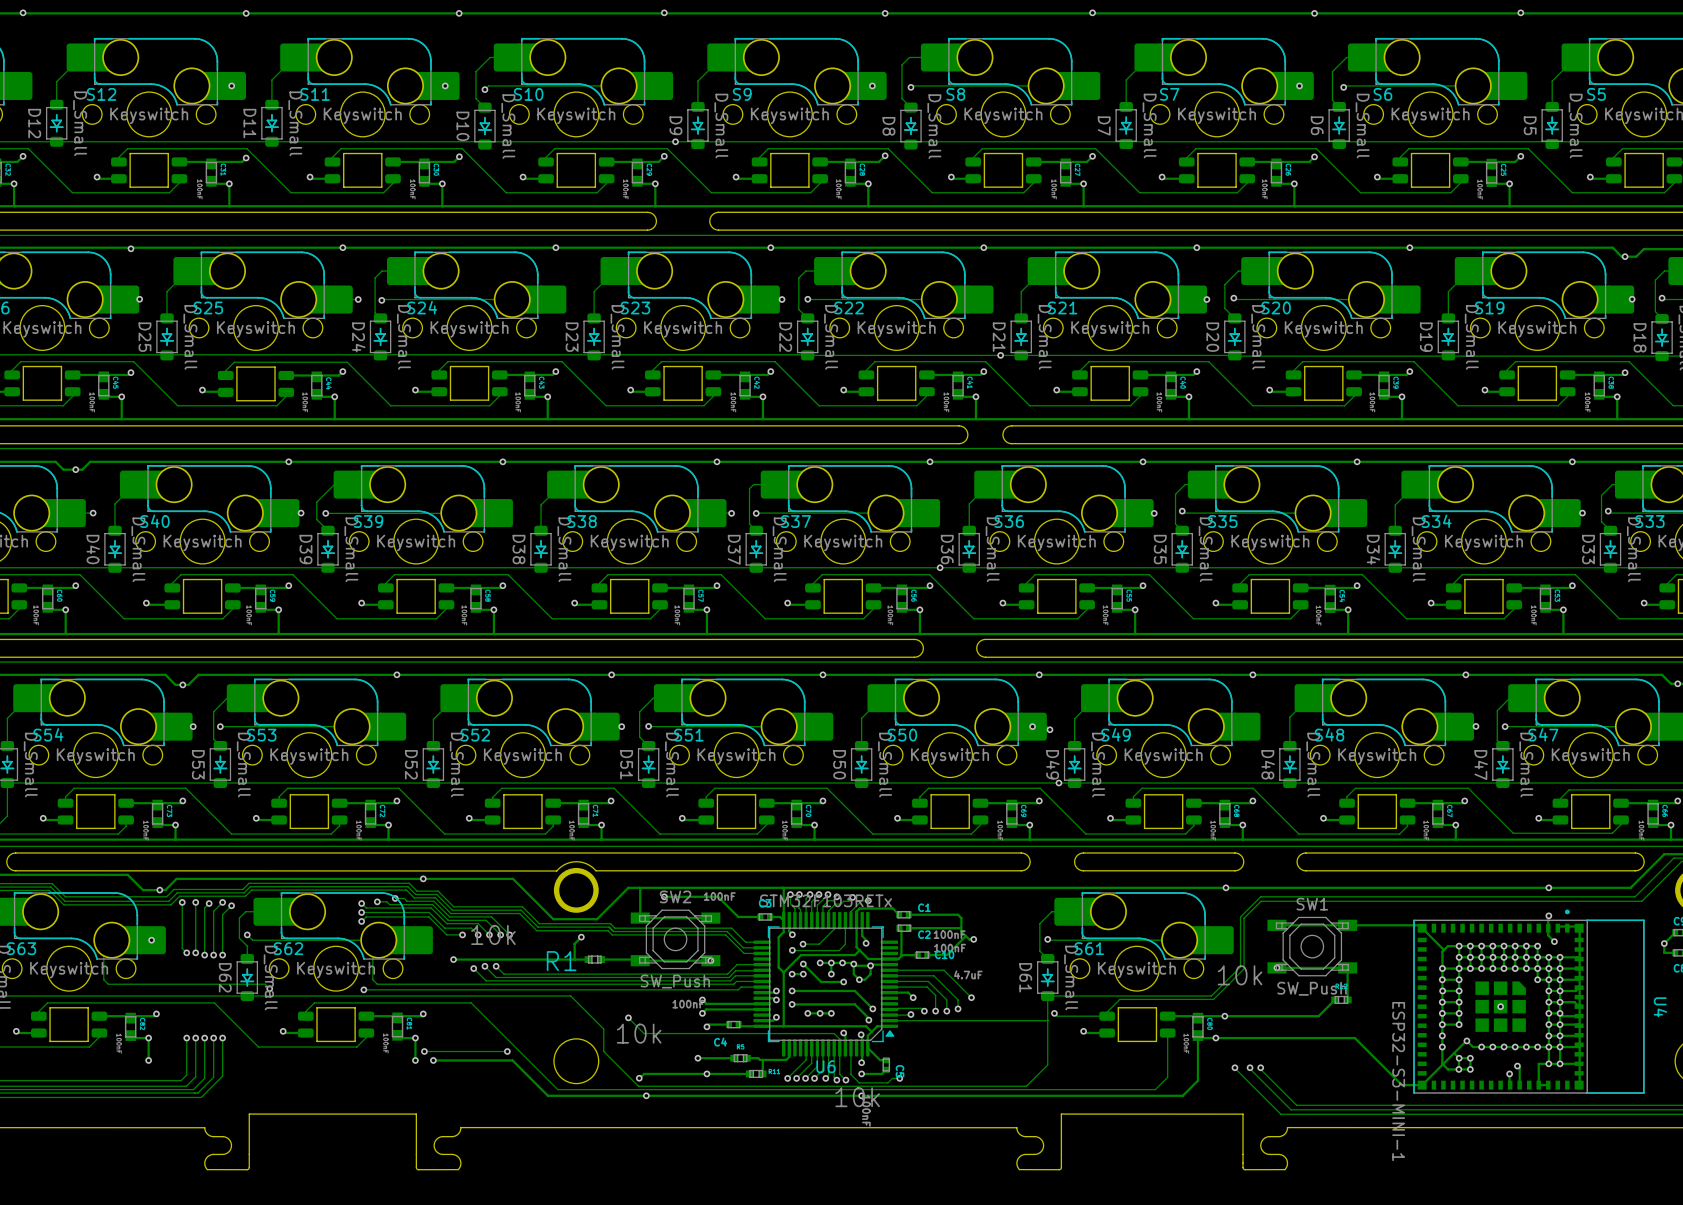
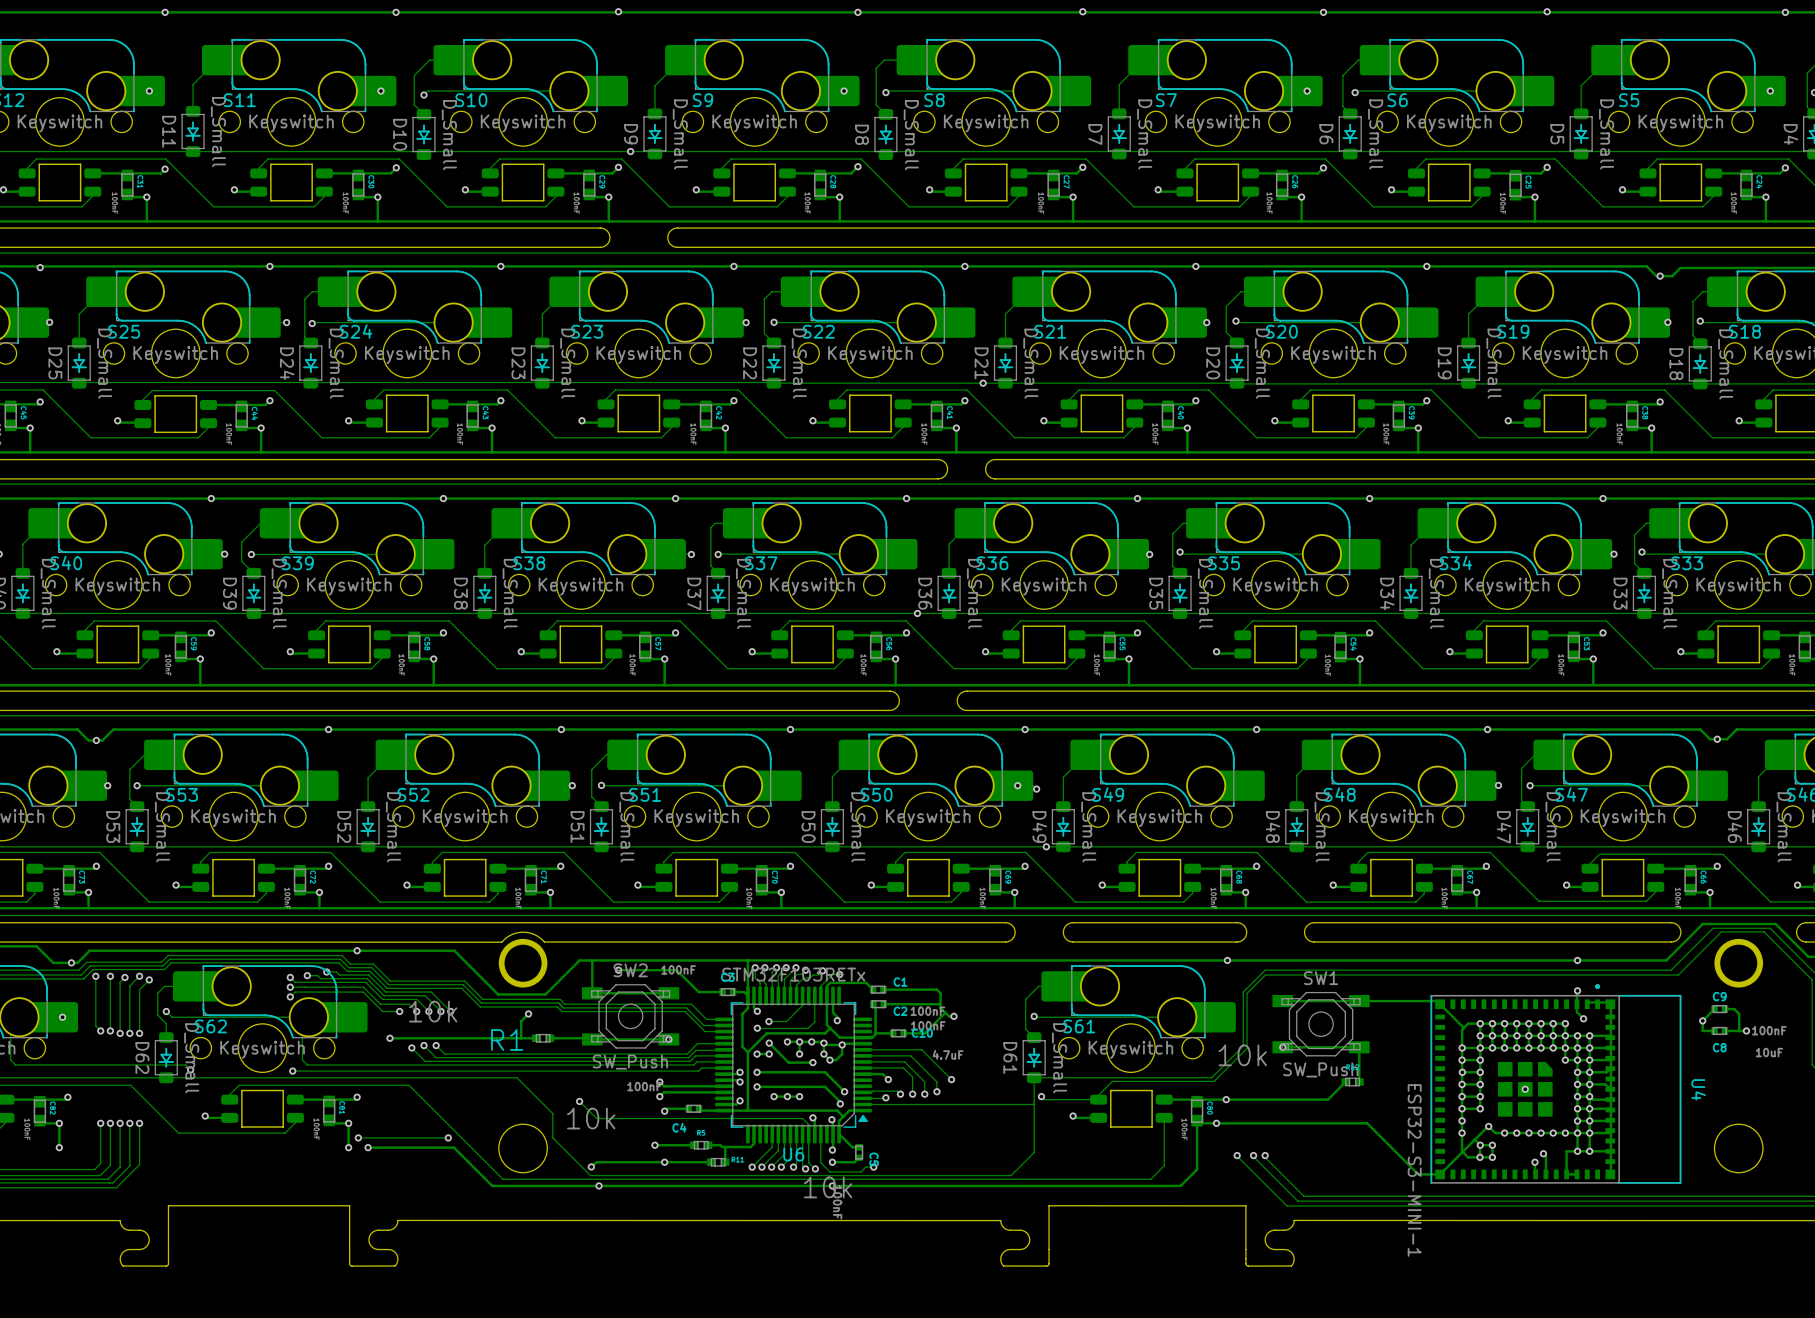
via: none -> (823, 1054)

